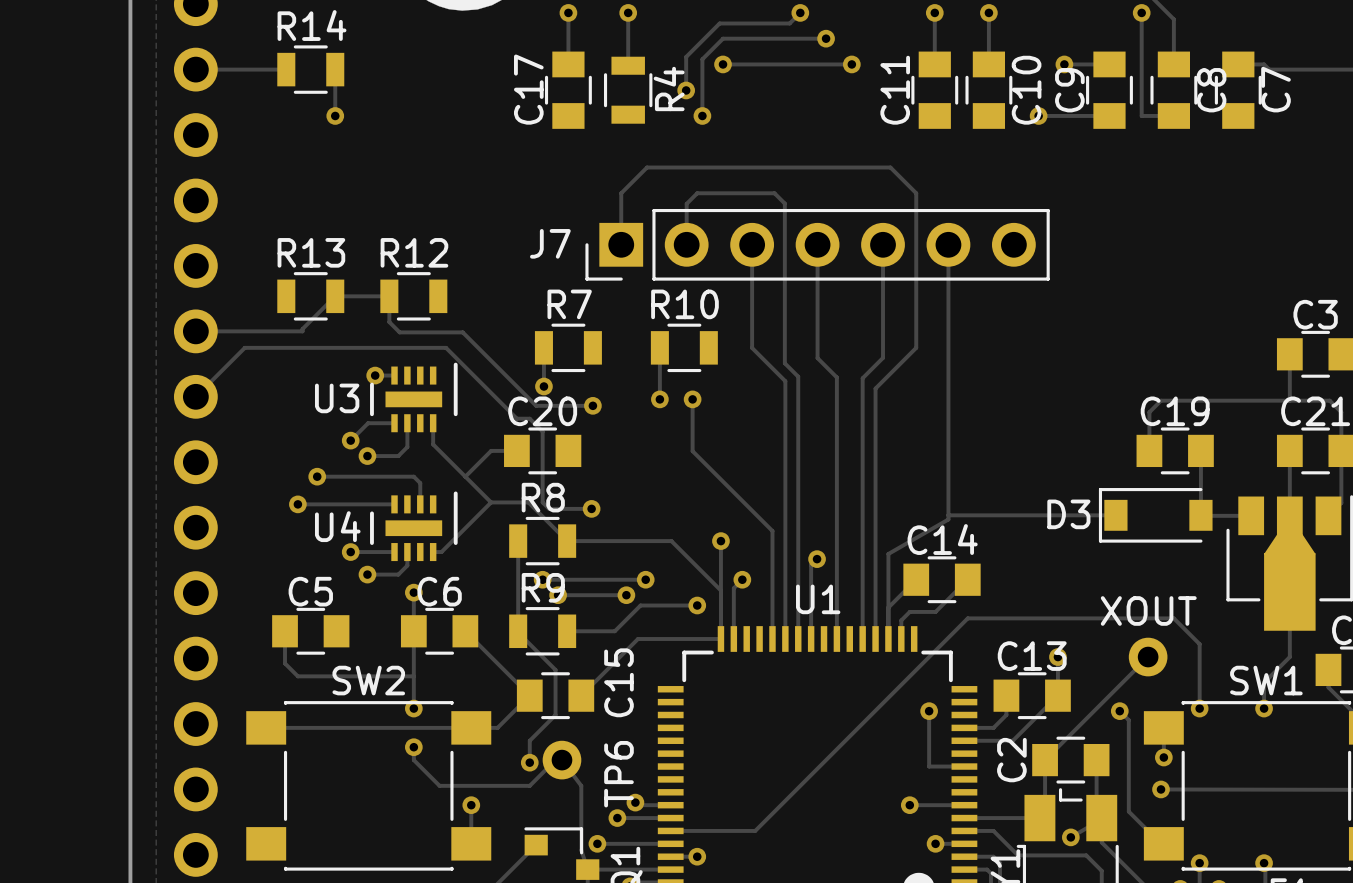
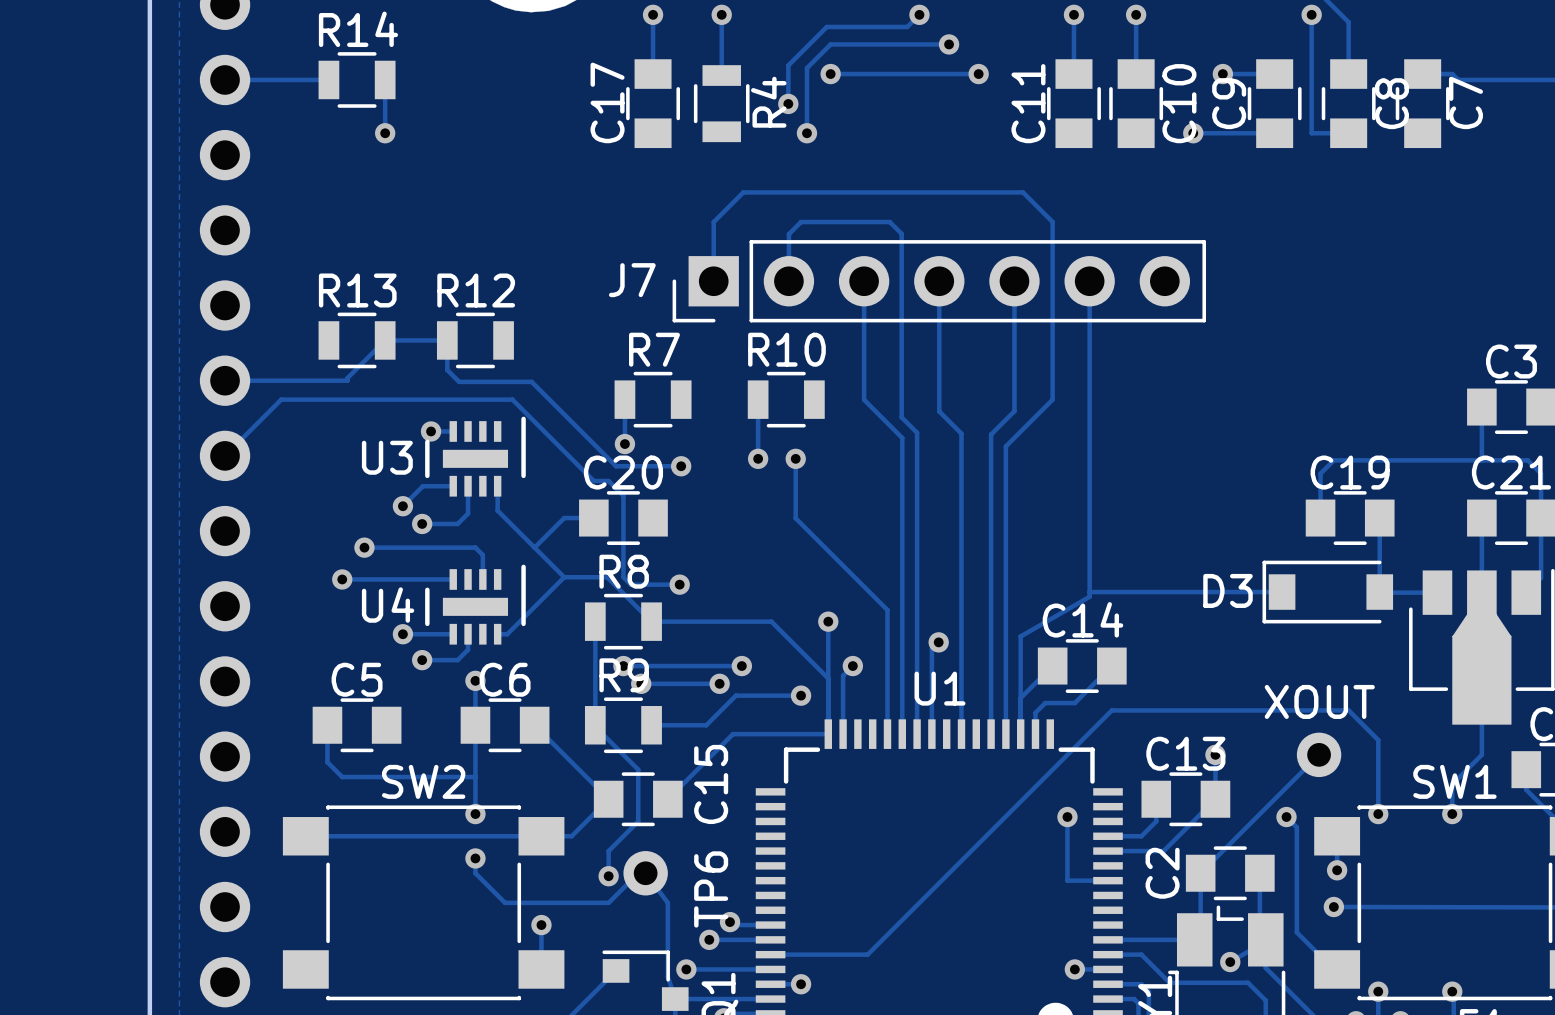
track: (909, 805) (964, 805) -> none
via: (909, 805) -> none

